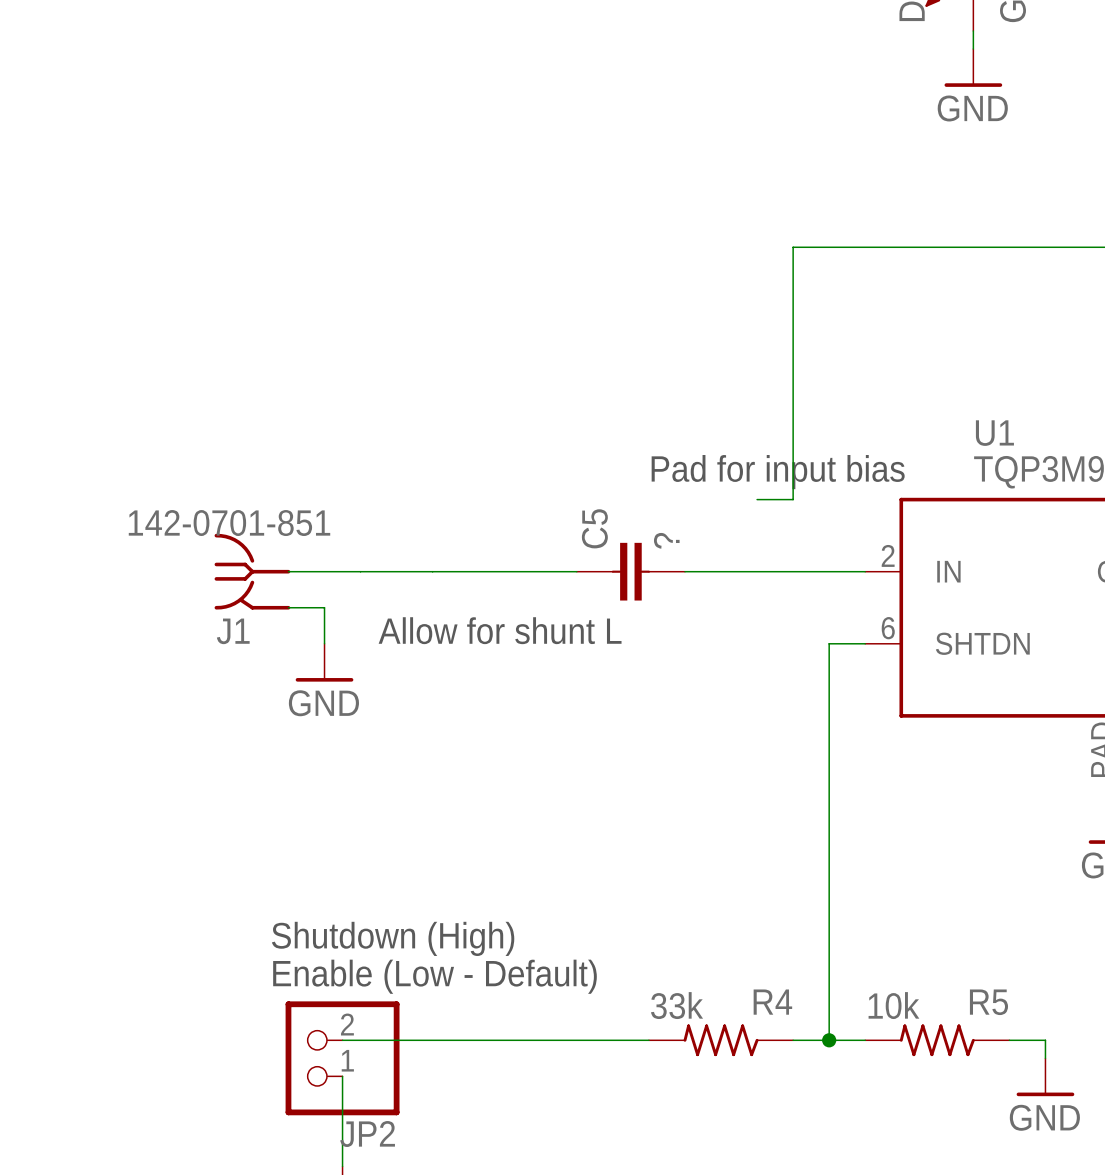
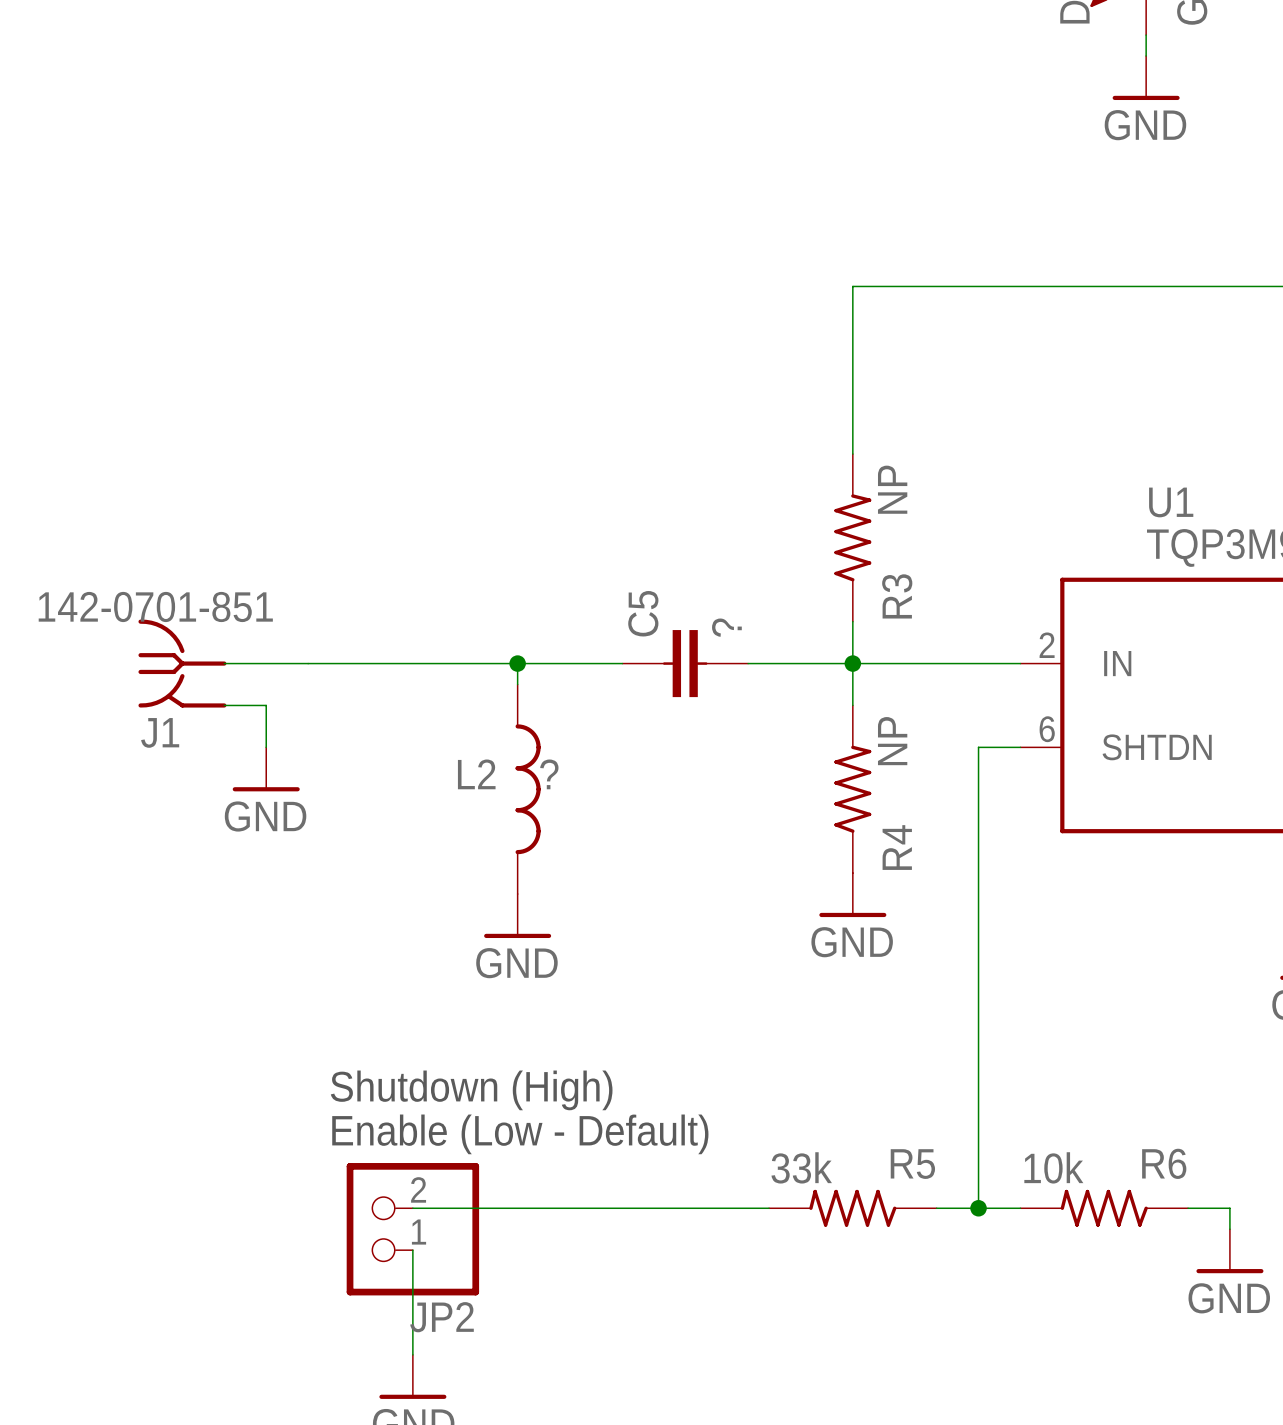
wire: (793, 247) (793, 499) (757, 499) -> (936, 286) (852, 286) (852, 454)
R3: none -> NP (852, 537)
text: Pad for input bias (778, 472) -> none
wire: none -> (852, 621) (852, 705)
wire: none -> (224, 663) (350, 663)
J1 position: (252, 571) -> (182, 663)
wire: none -> (517, 663) (517, 684)
junction: none -> (517, 663)
C5 position: (630, 571) -> (685, 663)
junction: none -> (852, 663)
wire: (288, 607) (324, 607) (324, 643) -> (224, 705) (266, 705) (266, 747)
text: Allow for shunt L (500, 630) -> none
power symbol: none -> GND (266, 769)
power symbol: GND (324, 662) -> none
L2: none -> ? (528, 789)
R4: none -> NP (852, 789)
power symbol: none -> GND (852, 895)
power symbol: none -> GND (517, 916)
R4 name: R4 (772, 1002) -> R5 (912, 1164)
R5 name: R5 (988, 1002) -> R6 (1164, 1163)

